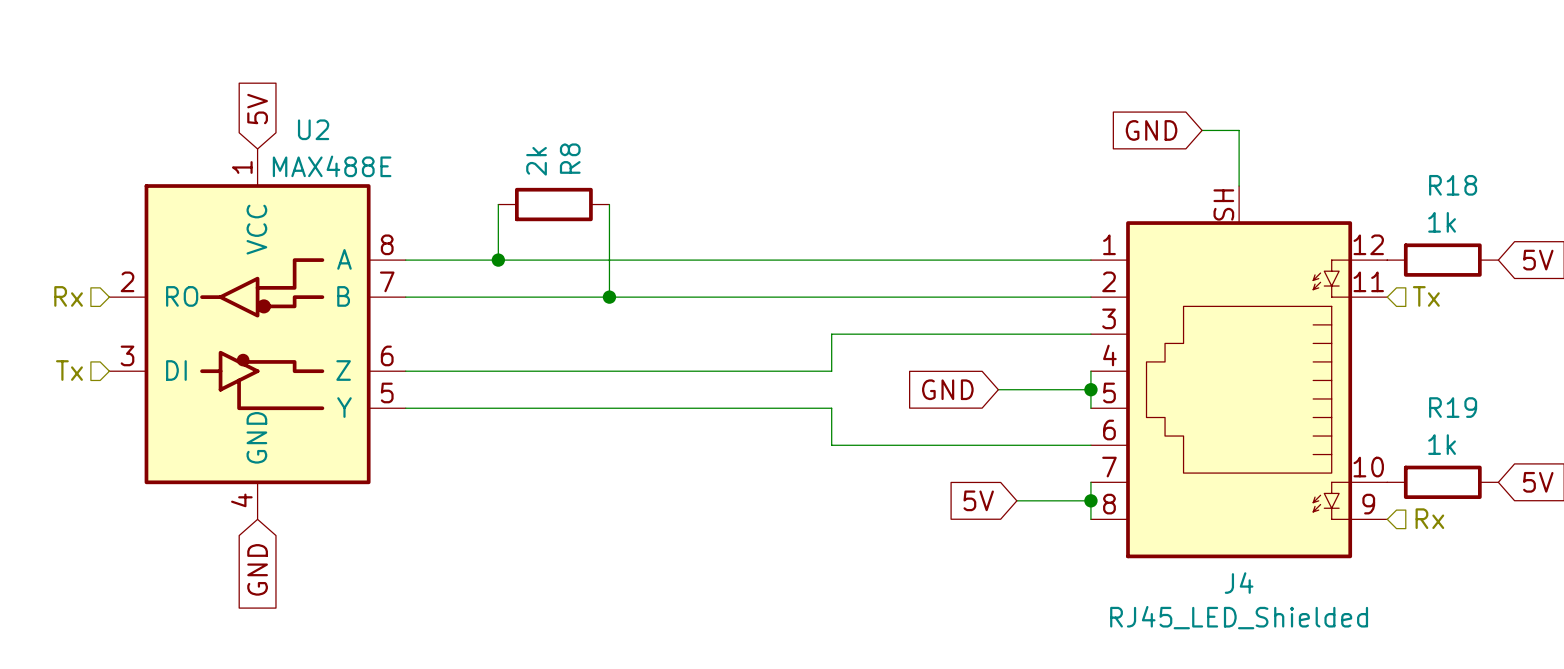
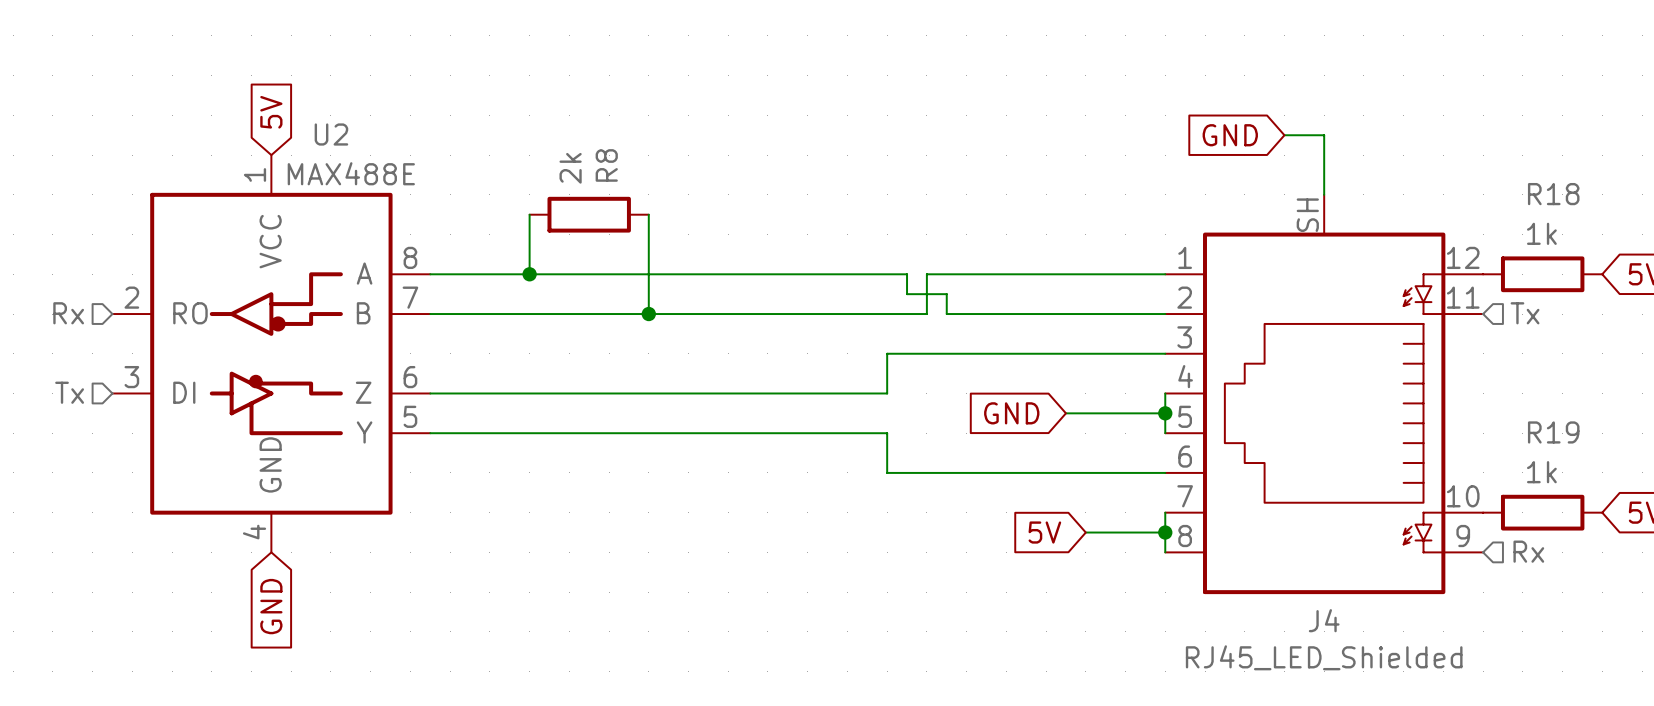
wire: (850, 260) (868, 260) -> (907, 274) (907, 294) (946, 294) (946, 314)
wire: (868, 297) (887, 297) -> (926, 314) (926, 274)

